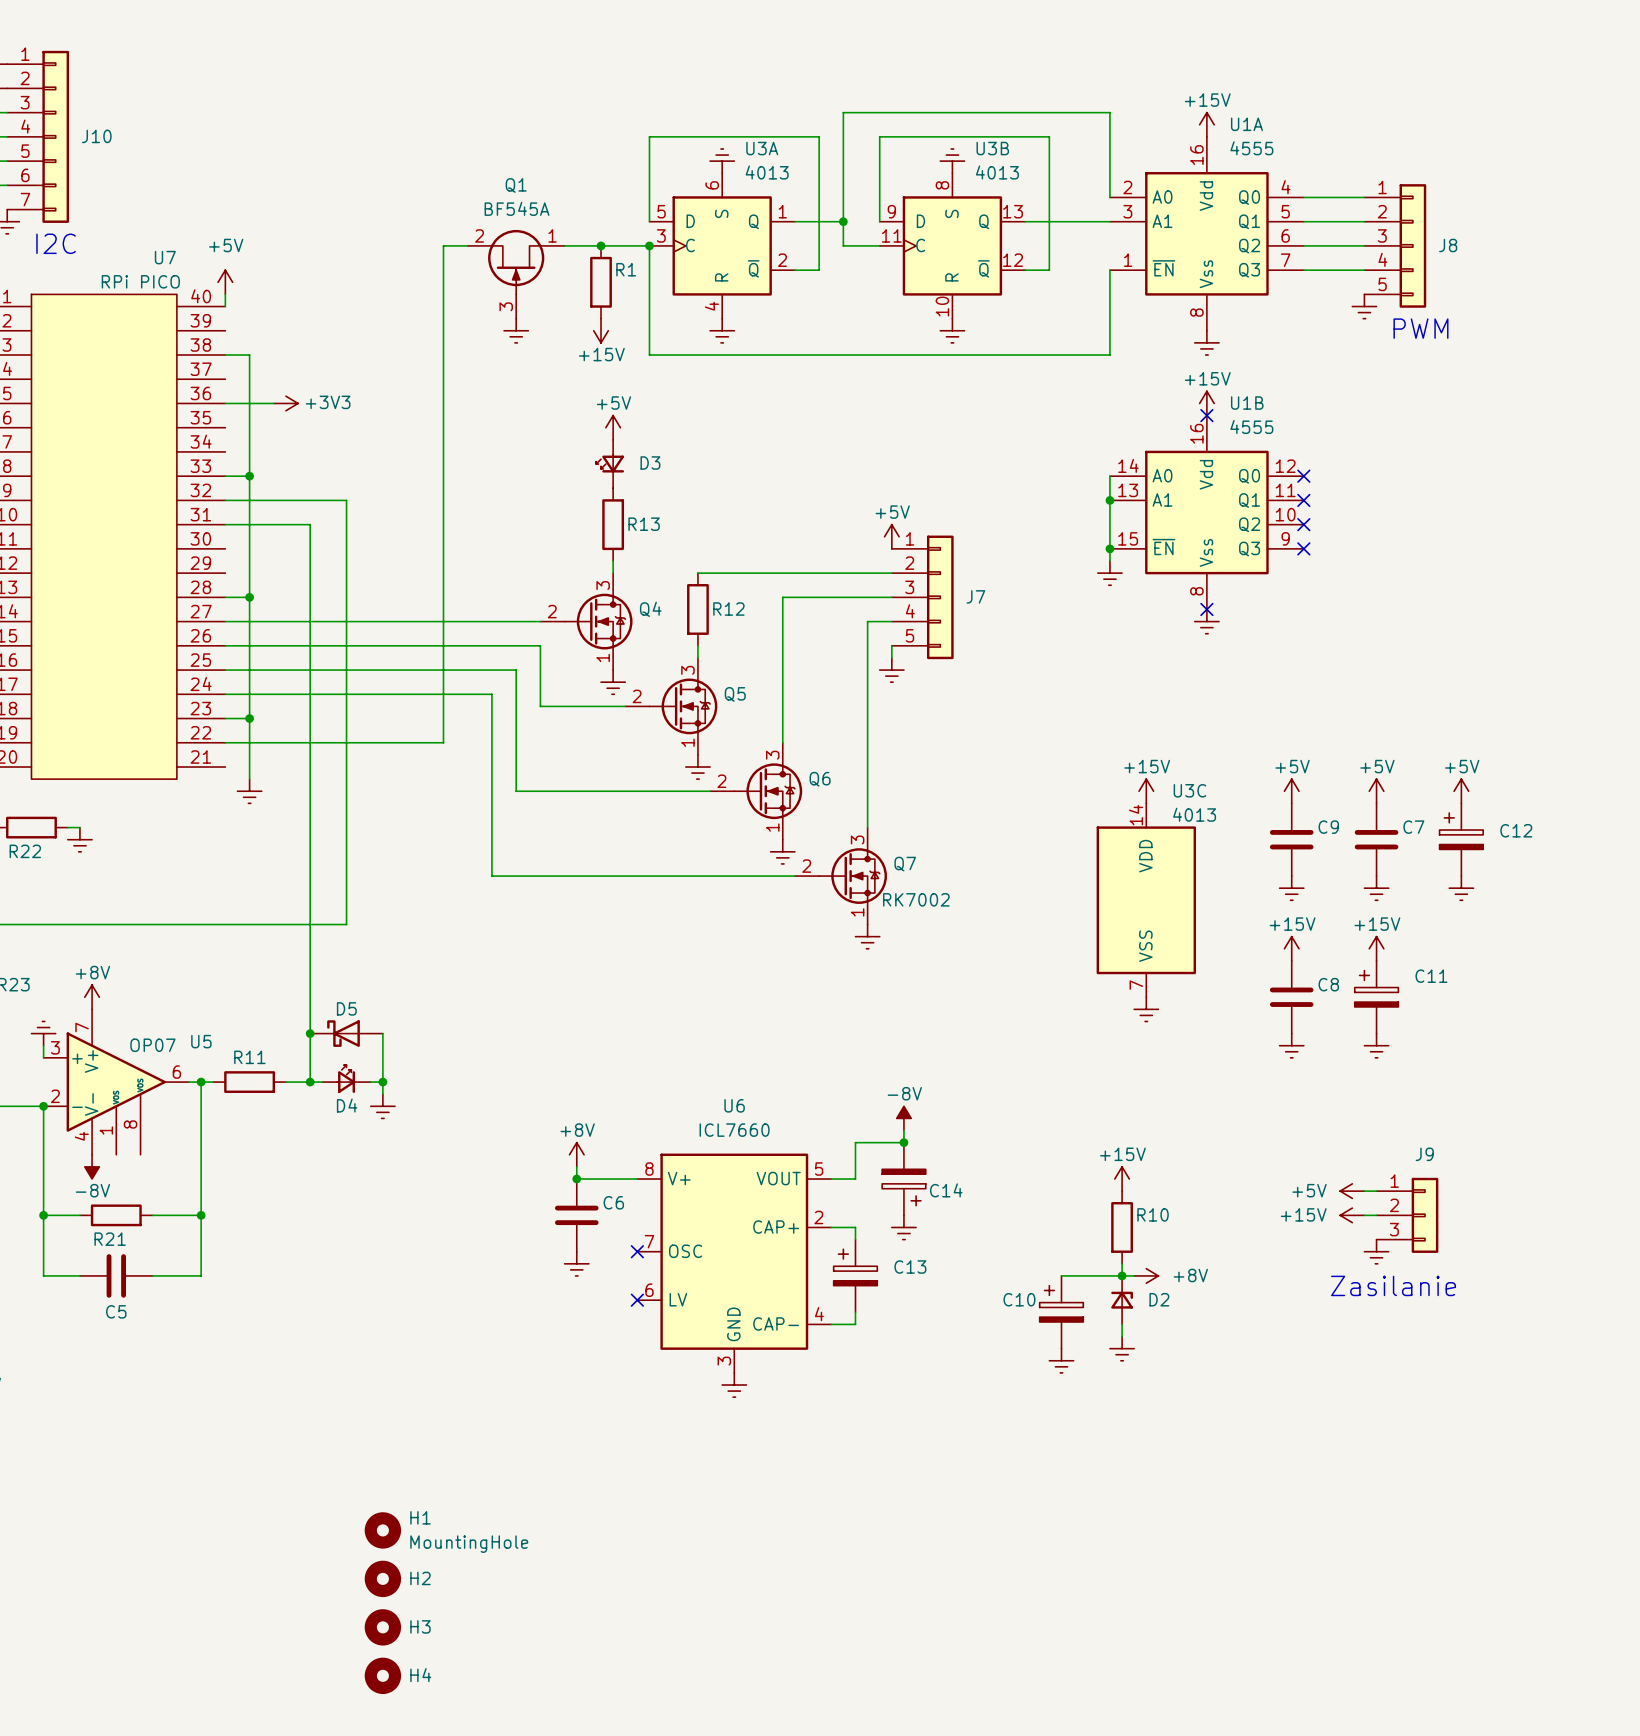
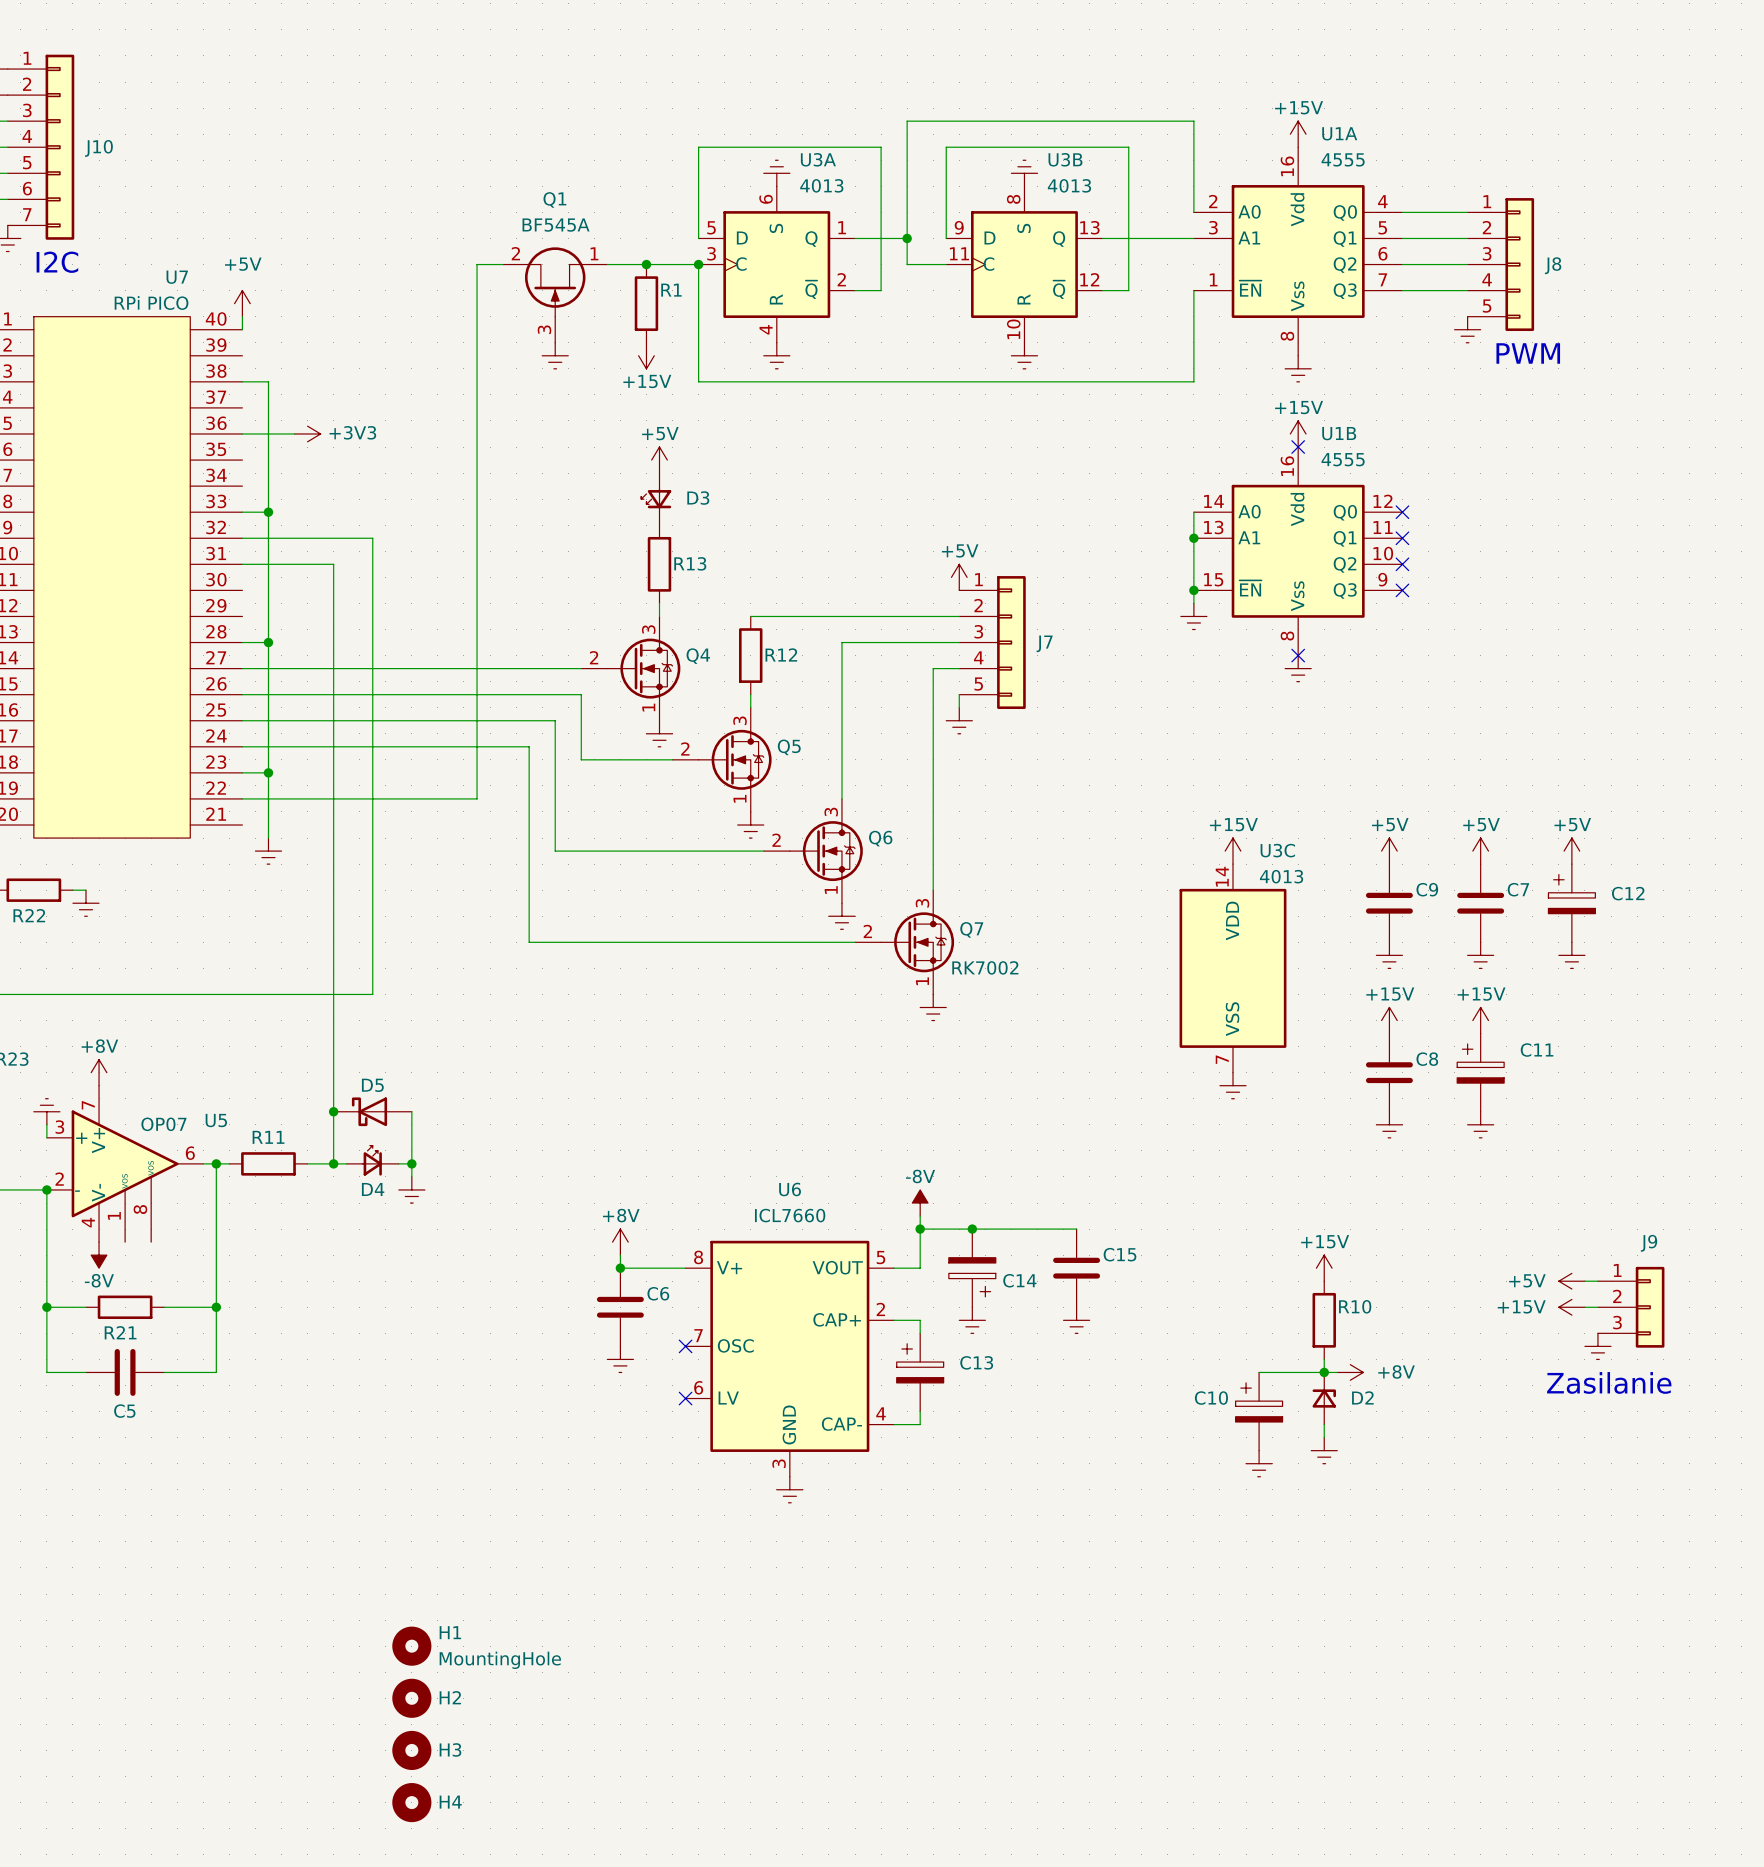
power symbol position: -8V (903, 1118) -> -8V (920, 1203)
wire: none -> (920, 1216) (920, 1229)
wire: (903, 1130) (903, 1142) -> (1076, 1229) (972, 1229)
junction: none -> (920, 1229)
C15: none -> (1076, 1268)
power symbol: +15V (1122, 1179) -> none
power symbol: none -> +15V (1324, 1268)
power symbol position: +5V (1352, 1191) -> +5V (1571, 1281)
wire: (1364, 1191) (1376, 1191) -> (1584, 1281) (1597, 1281)
power symbol: +15V (1352, 1215) -> none
wire: (1364, 1215) (1376, 1215) -> (1584, 1307) (1597, 1307)
J9 position: (1407, 1215) -> (1631, 1307)
power symbol: none -> +15V (1571, 1307)
power symbol: none -> (1076, 1320)
R10 position: (1122, 1227) -> (1324, 1320)
power symbol: (1376, 1251) -> none
power symbol: none -> (1597, 1346)
wire: (1122, 1263) (1122, 1275) -> (1324, 1359) (1324, 1372)
wire: (1061, 1275) (1134, 1275) -> (1259, 1372) (1337, 1372)
junction: (1122, 1275) -> none
power symbol position: +8V (1146, 1275) -> +8V (1350, 1372)
junction: none -> (1324, 1372)
text position: Zasilanie (1393, 1285) -> Zasilanie (1609, 1382)
D2 position: (1122, 1300) -> (1324, 1398)
C10 position: (1061, 1312) -> (1259, 1411)
wire: (1122, 1324) (1122, 1336) -> (1324, 1424) (1324, 1437)
power symbol position: (1122, 1348) -> (1259, 1463)
power symbol: none -> (1324, 1450)
power symbol: (1061, 1360) -> none

